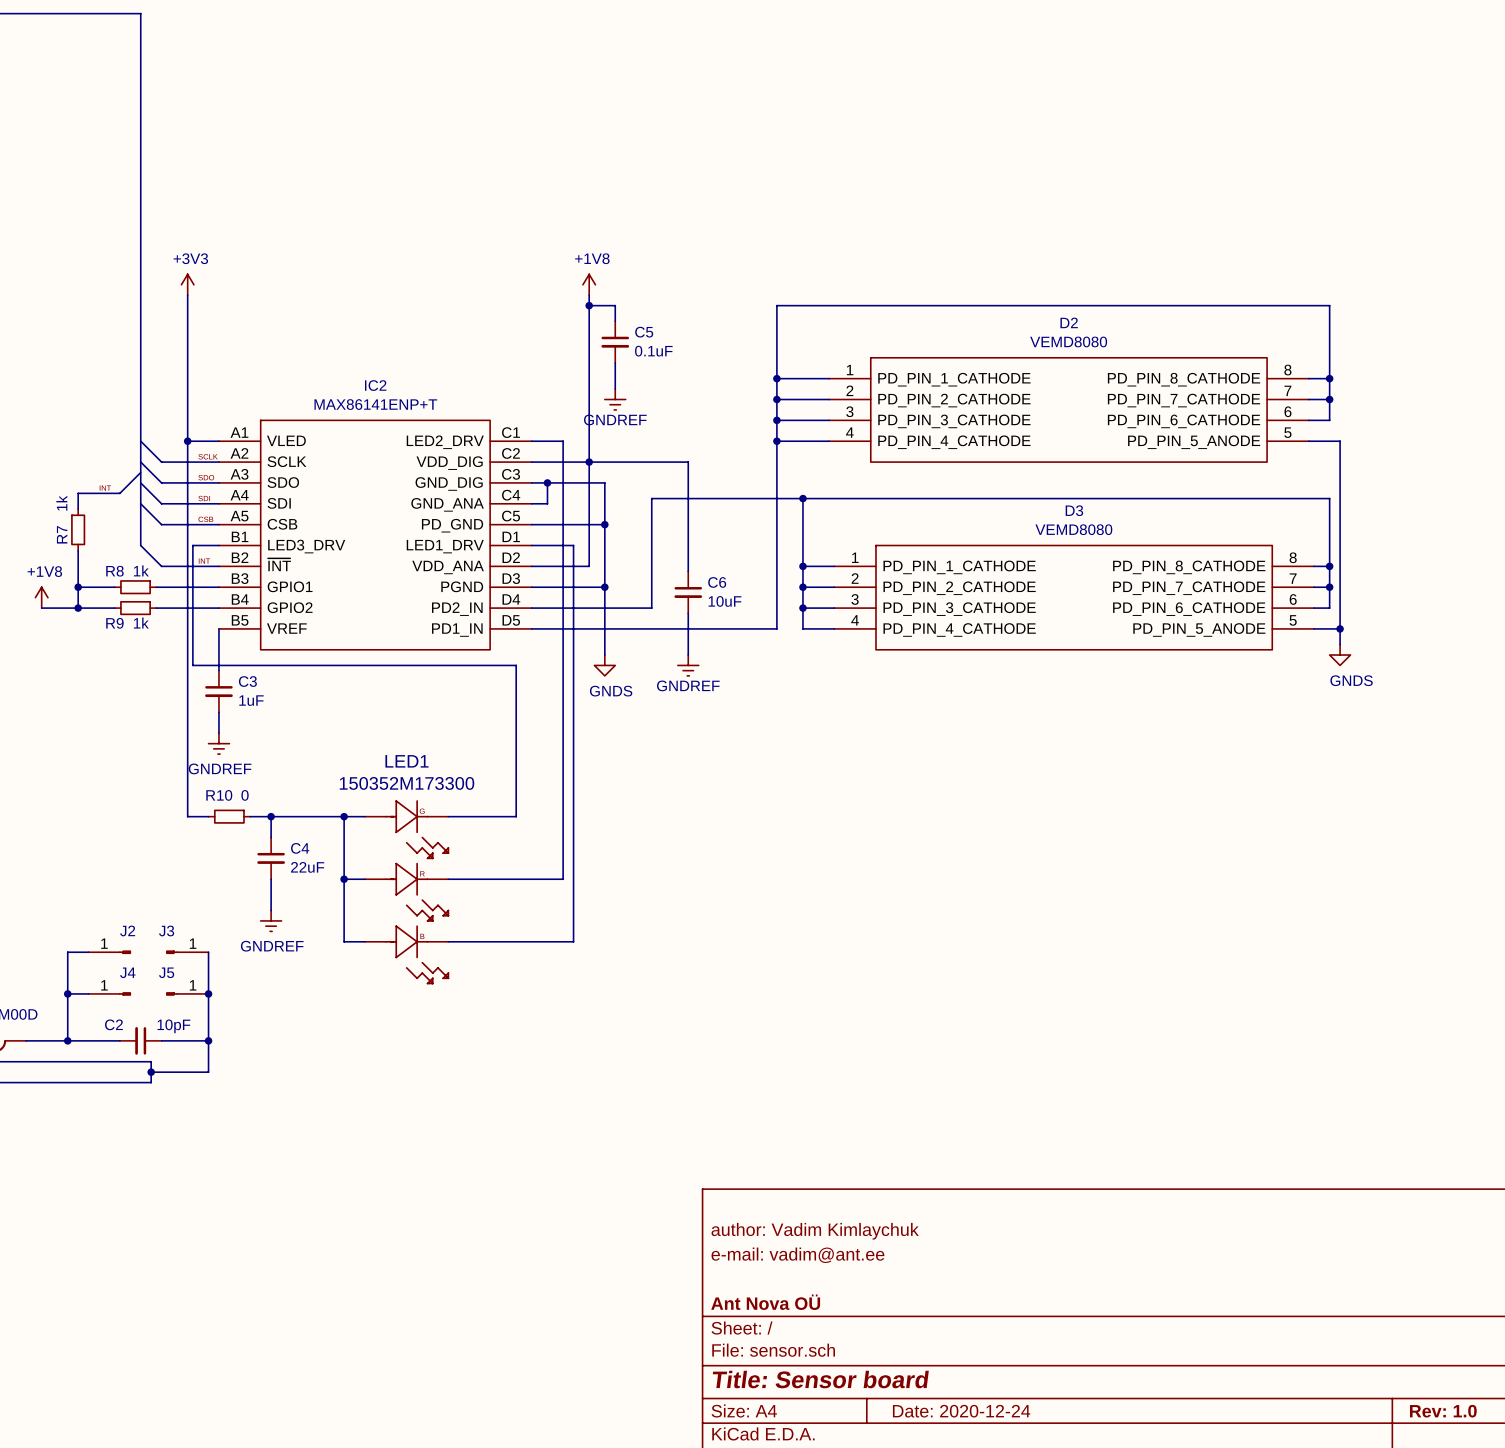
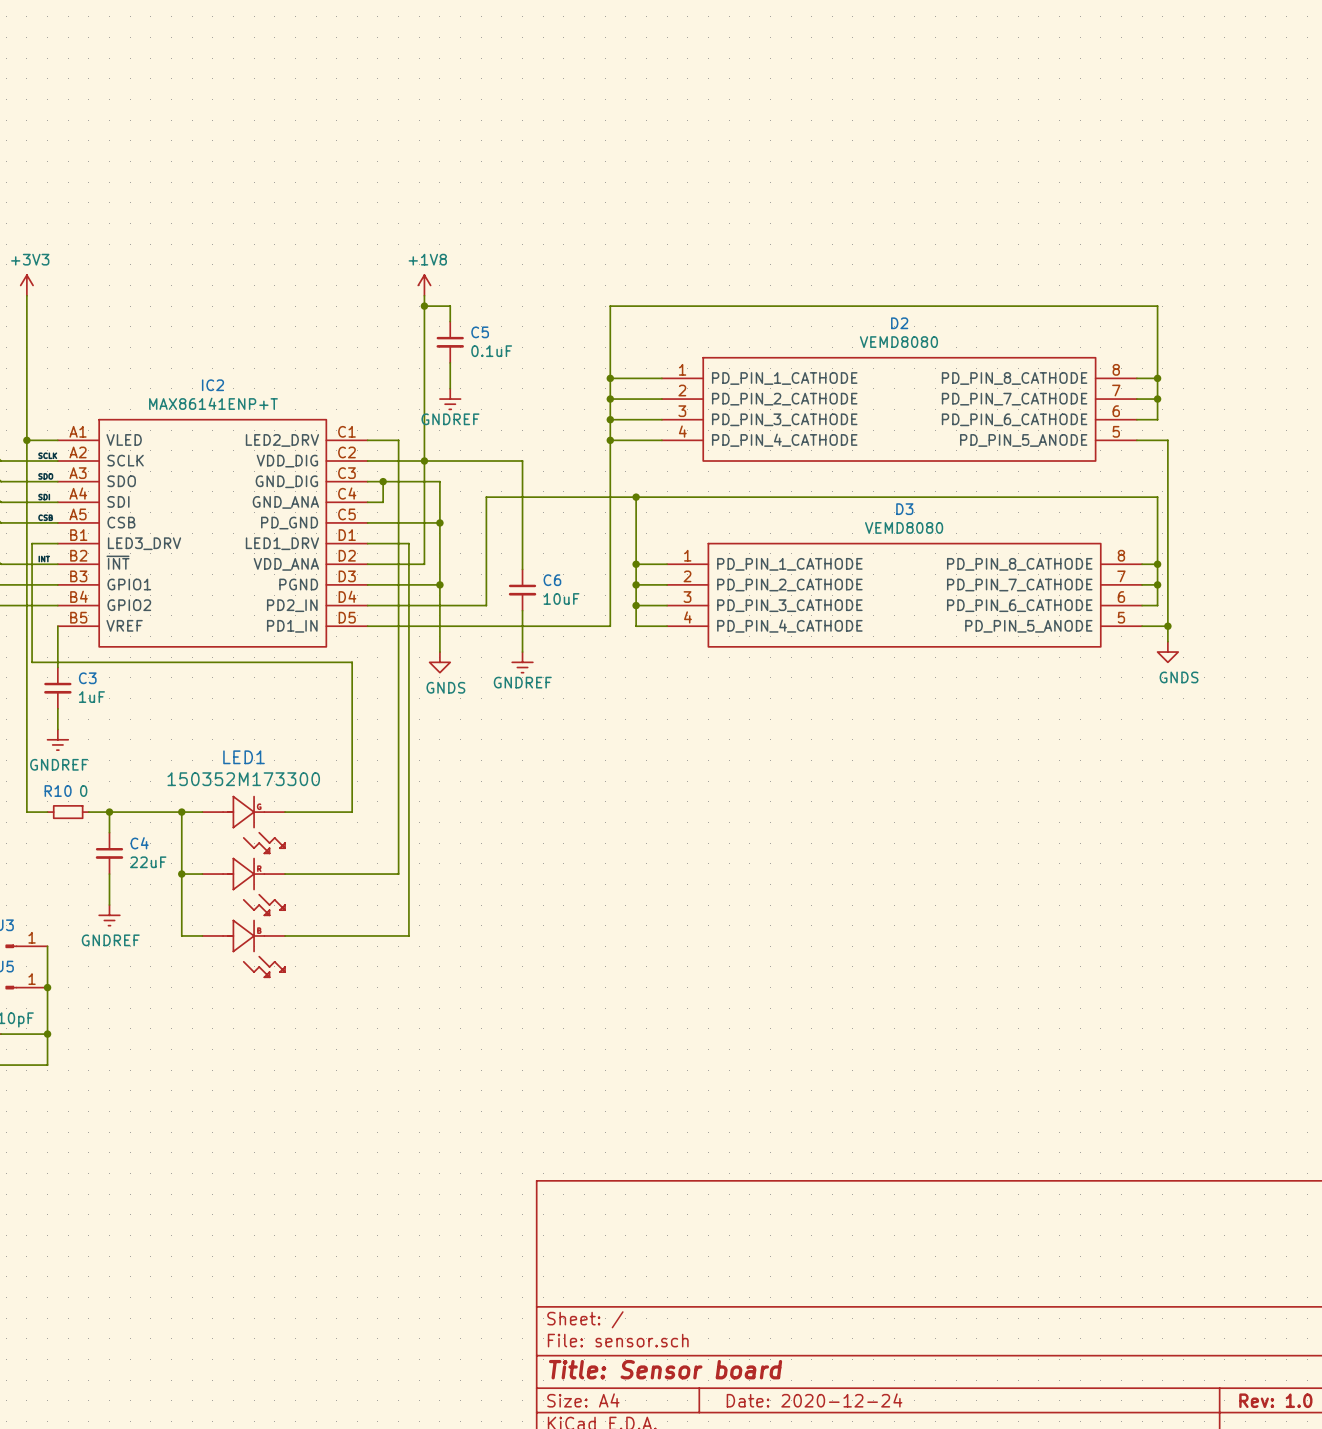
title block: author: Vadim Kimlaychuk (815, 1231) -> none
title block: e-mail: vadim@ant.ee (797, 1255) -> none
title block: Ant Nova OÜ (765, 1302) -> none

